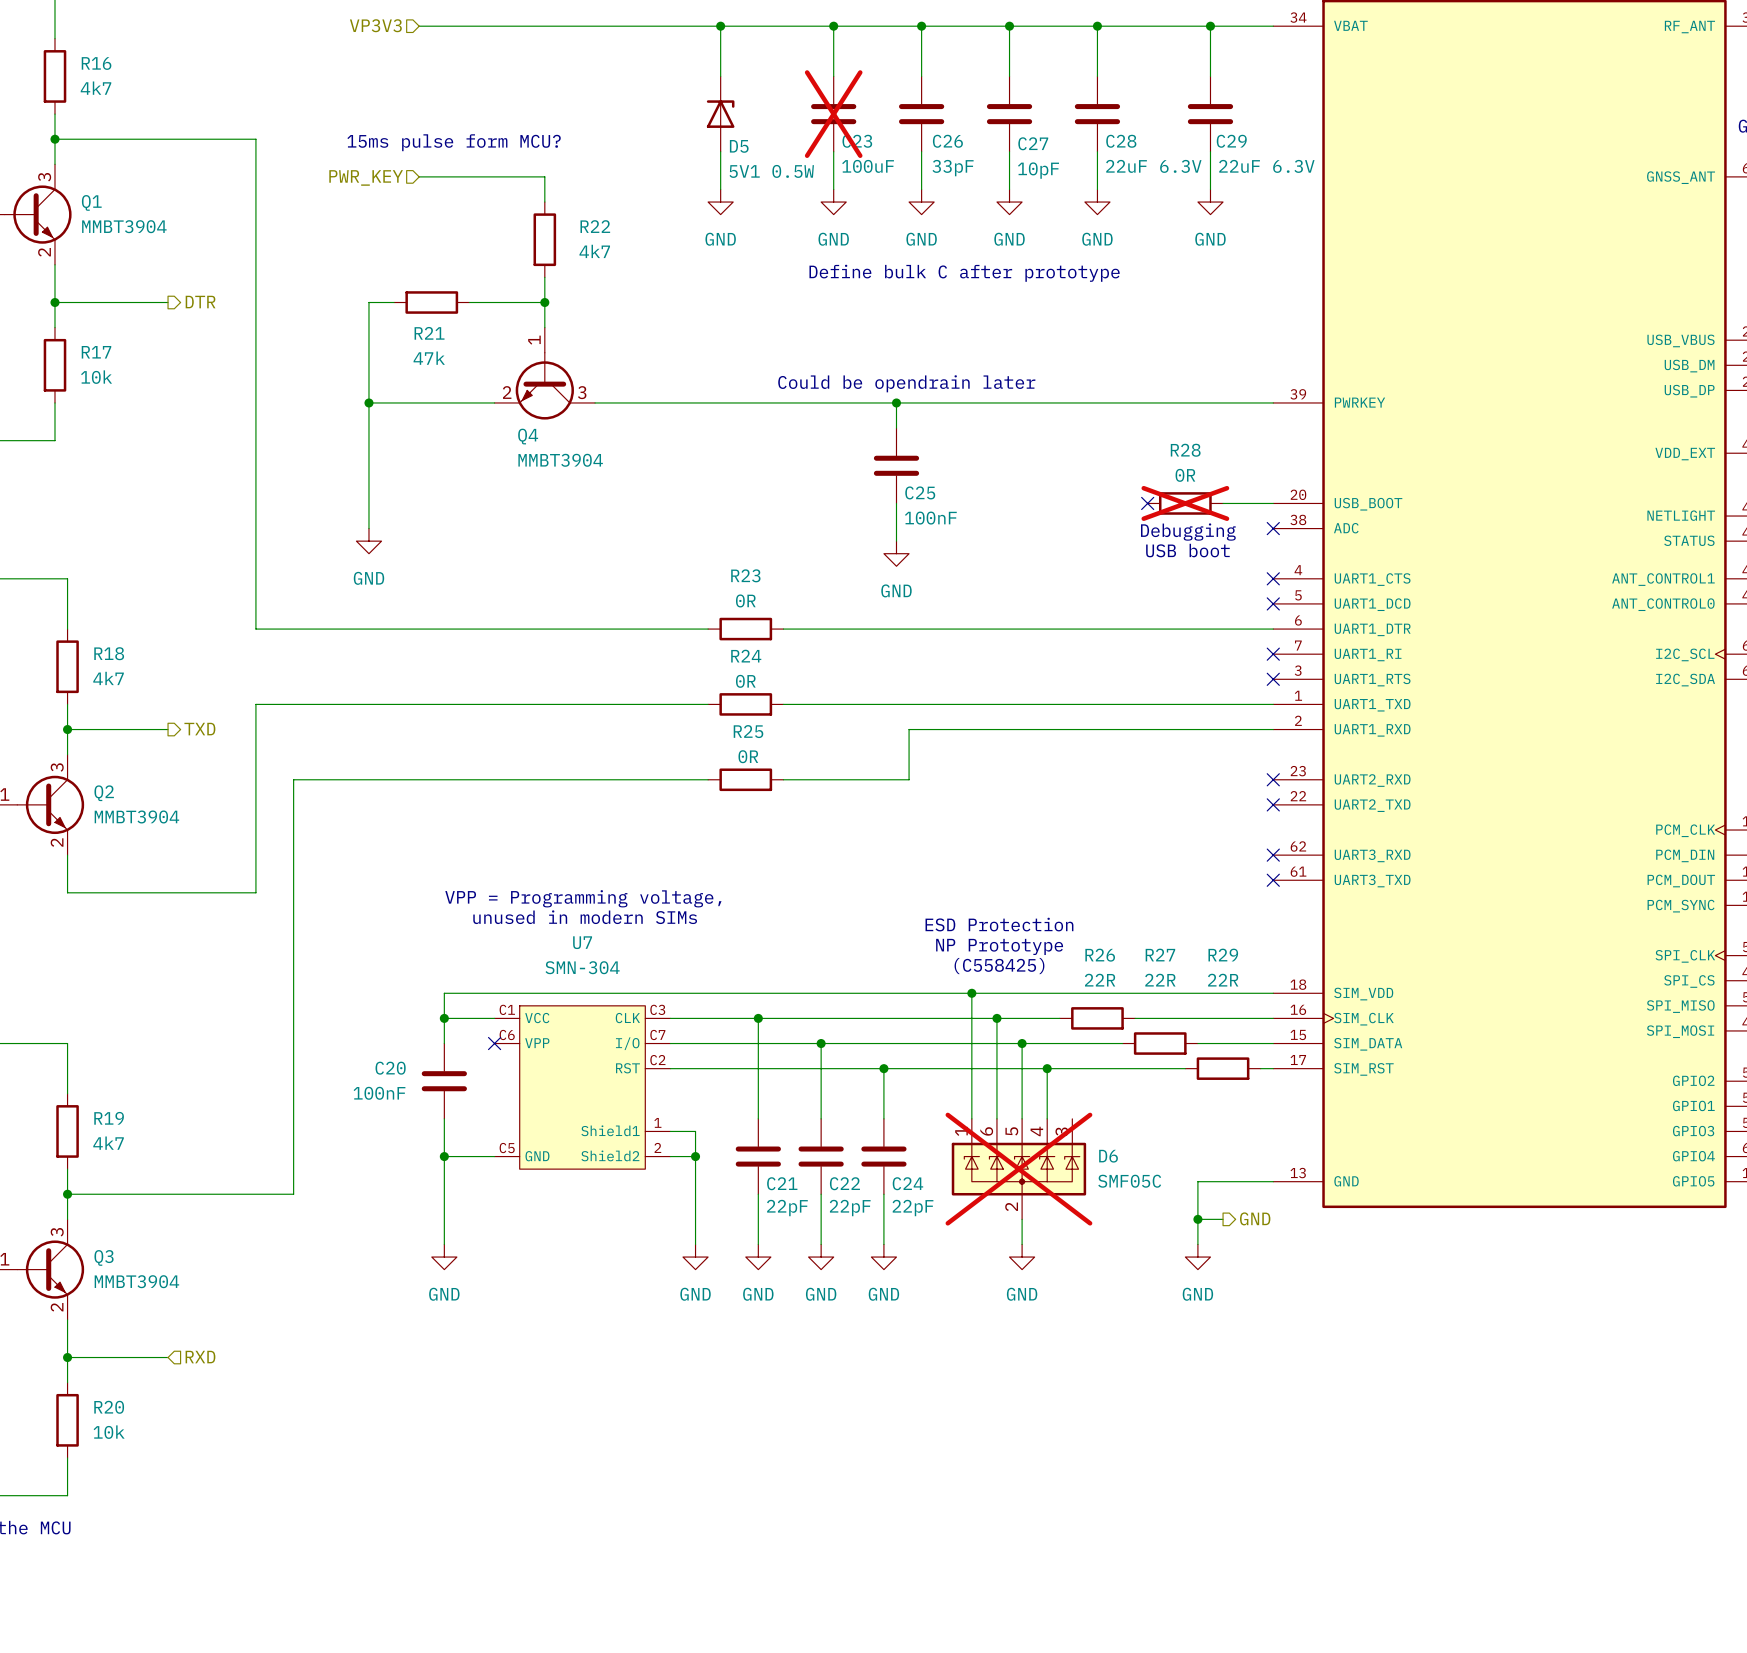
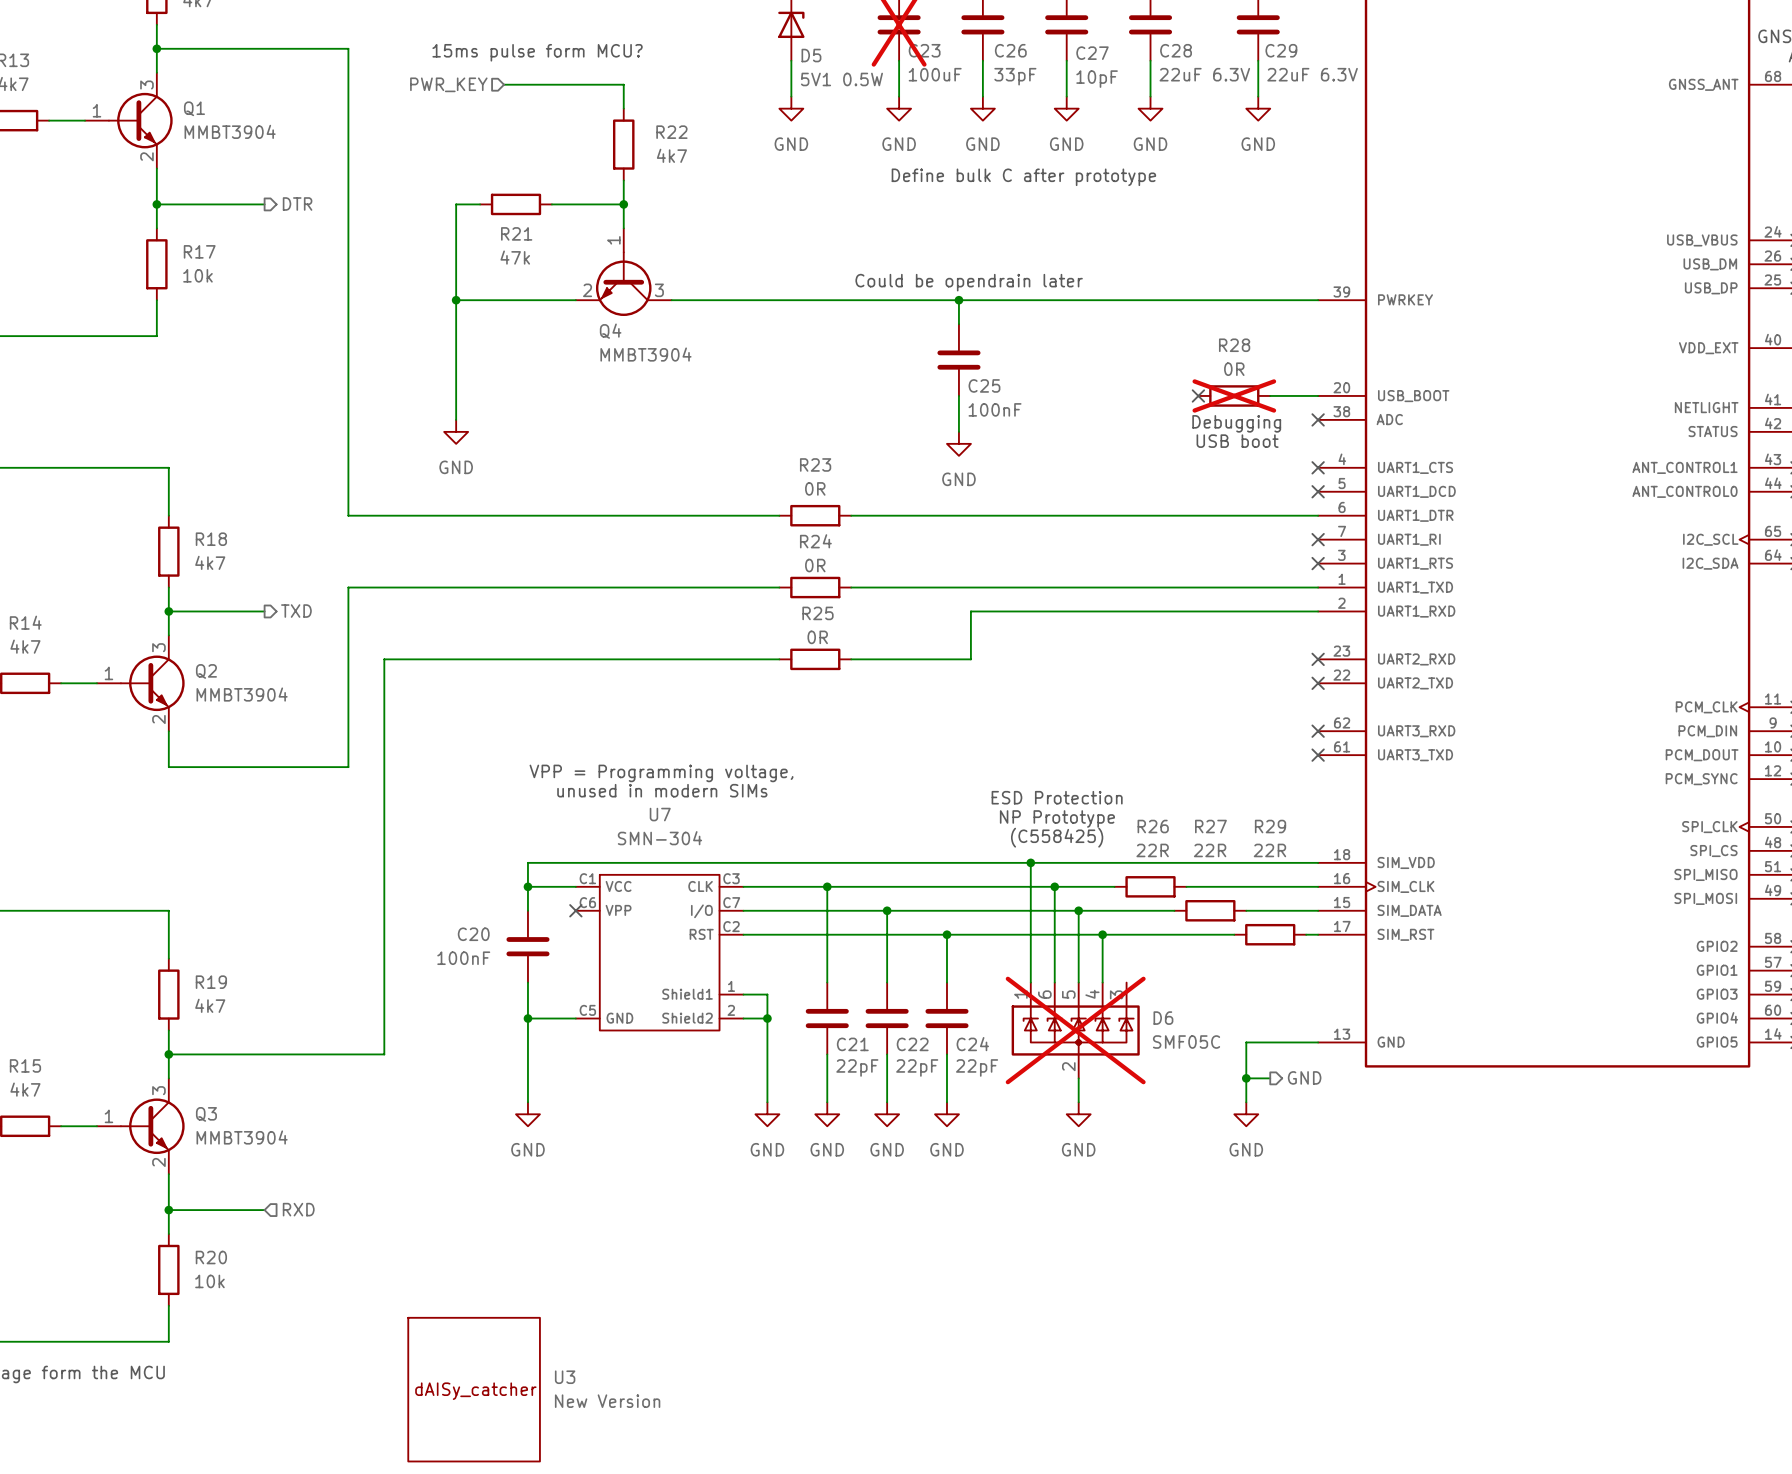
U3: none -> New Version (474, 1389)

